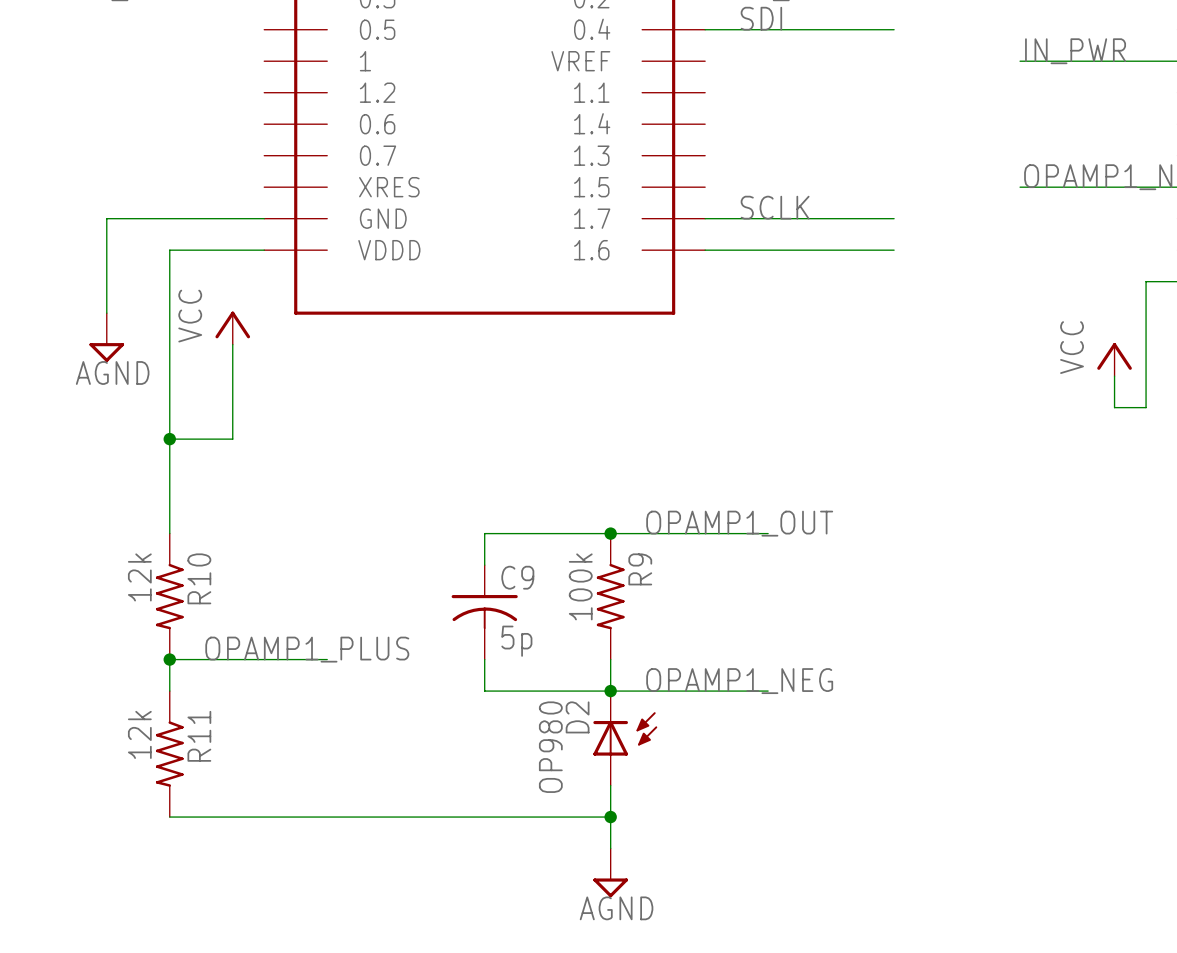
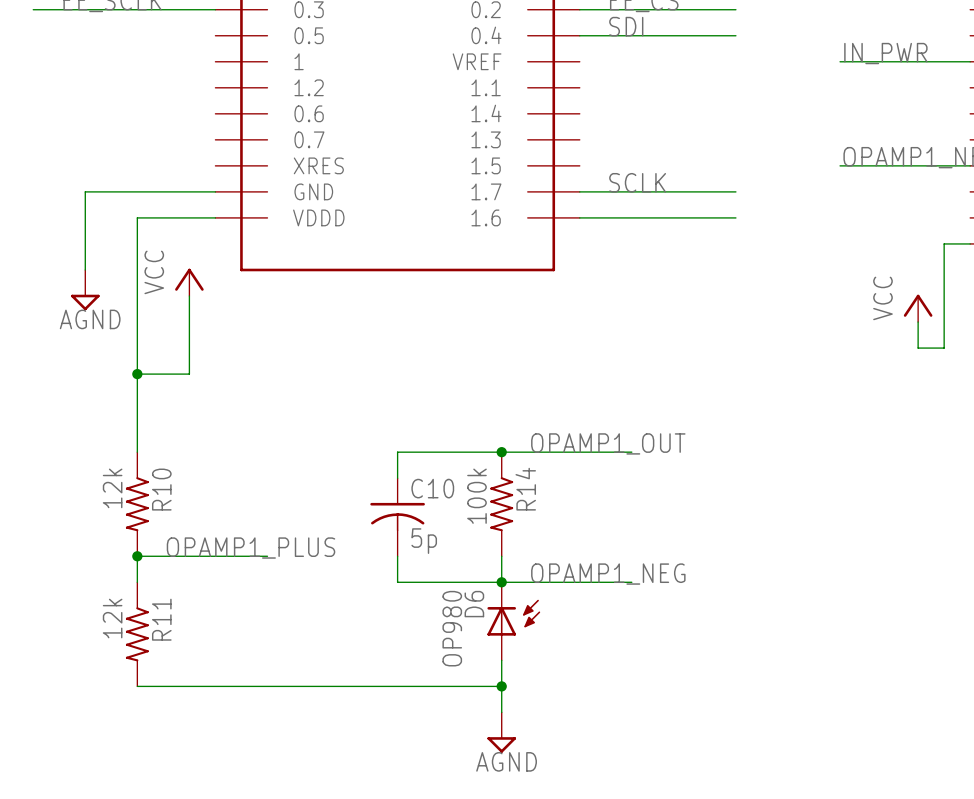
R9 name: R9 (640, 569) -> R14 (525, 489)
C9 name: C9 (517, 577) -> C10 (432, 488)
D2 name: D2 (577, 717) -> D6 (474, 604)

